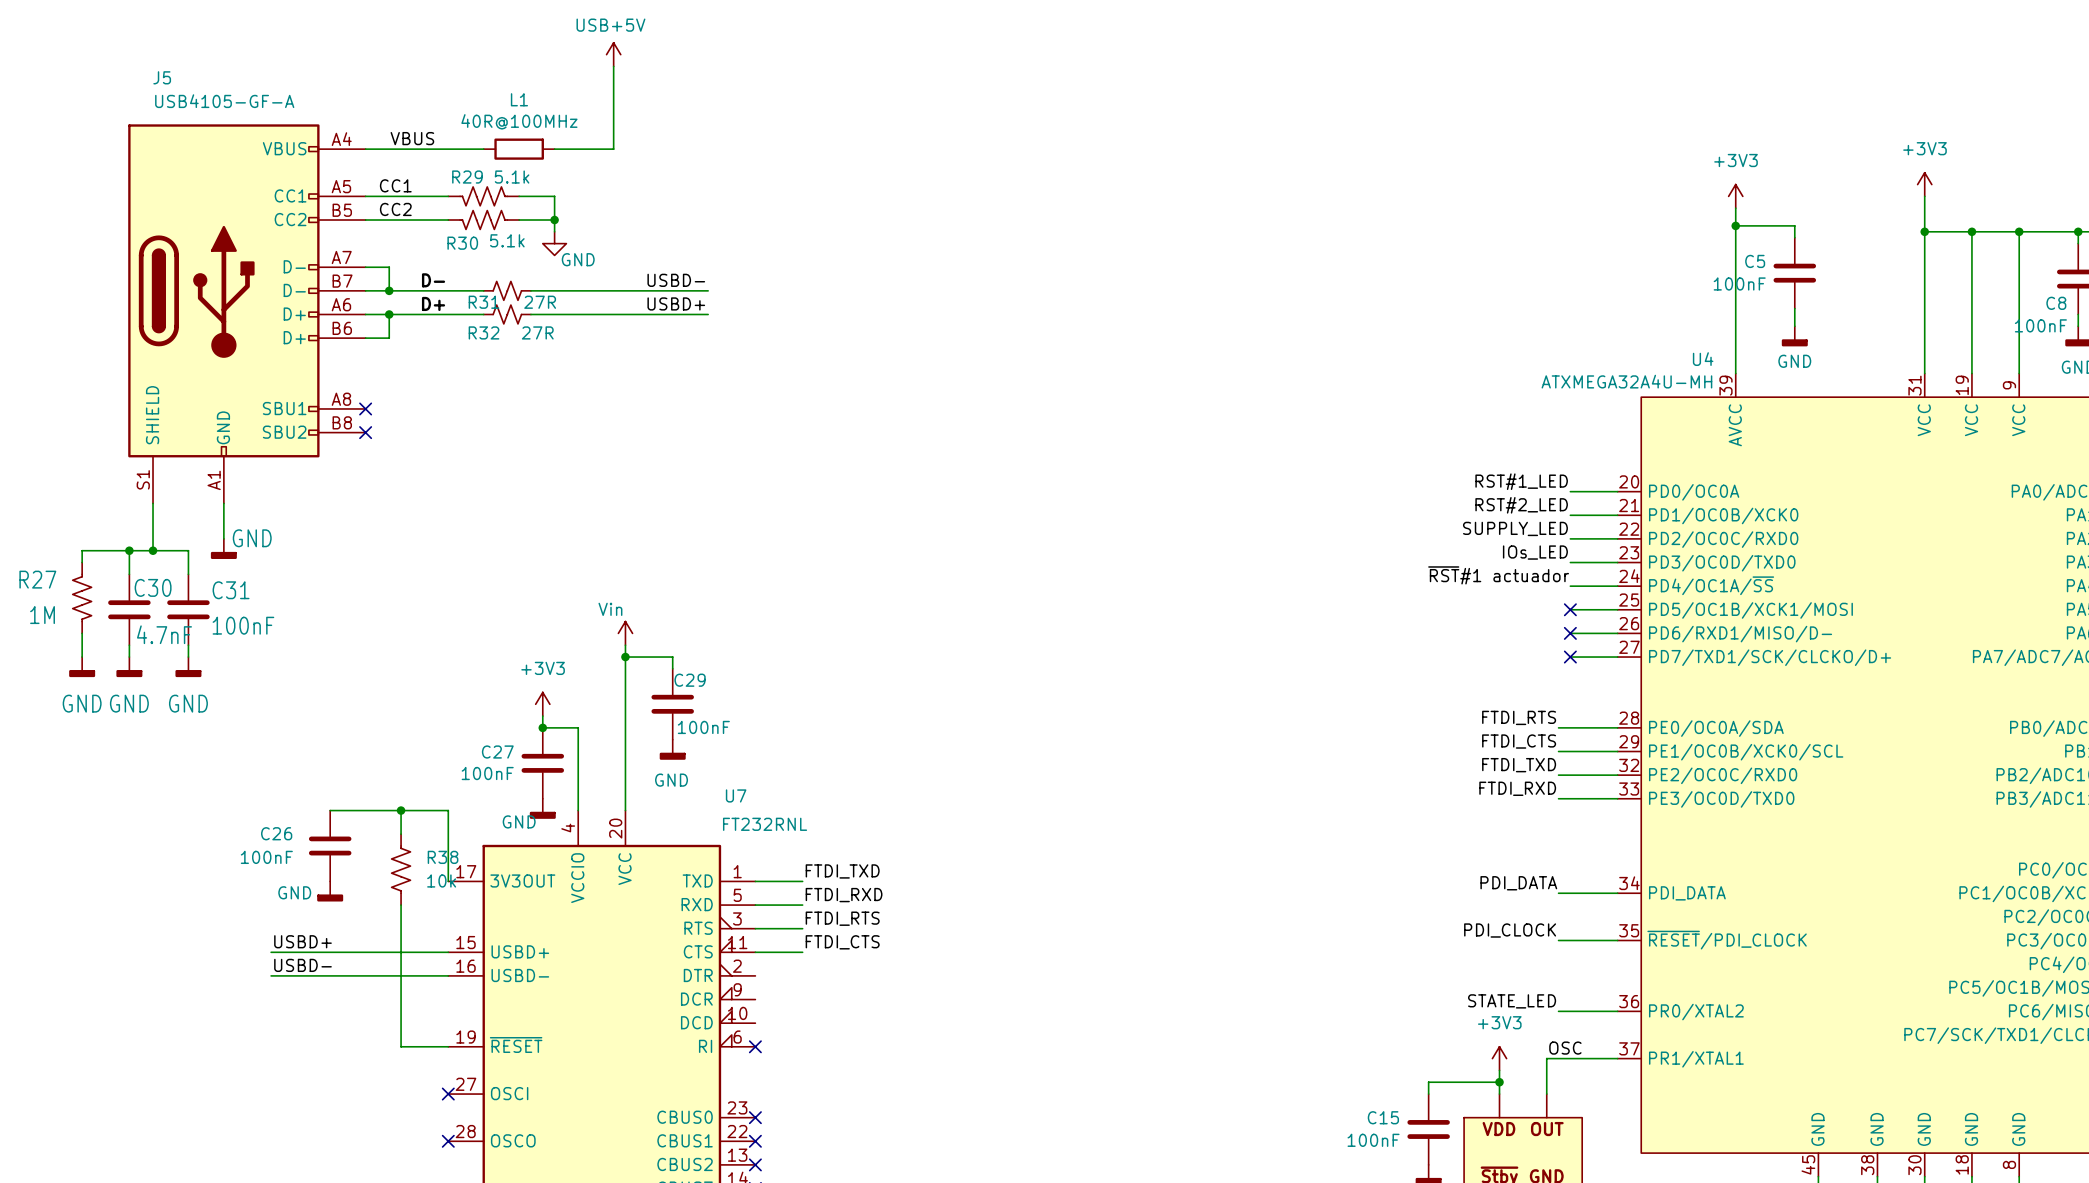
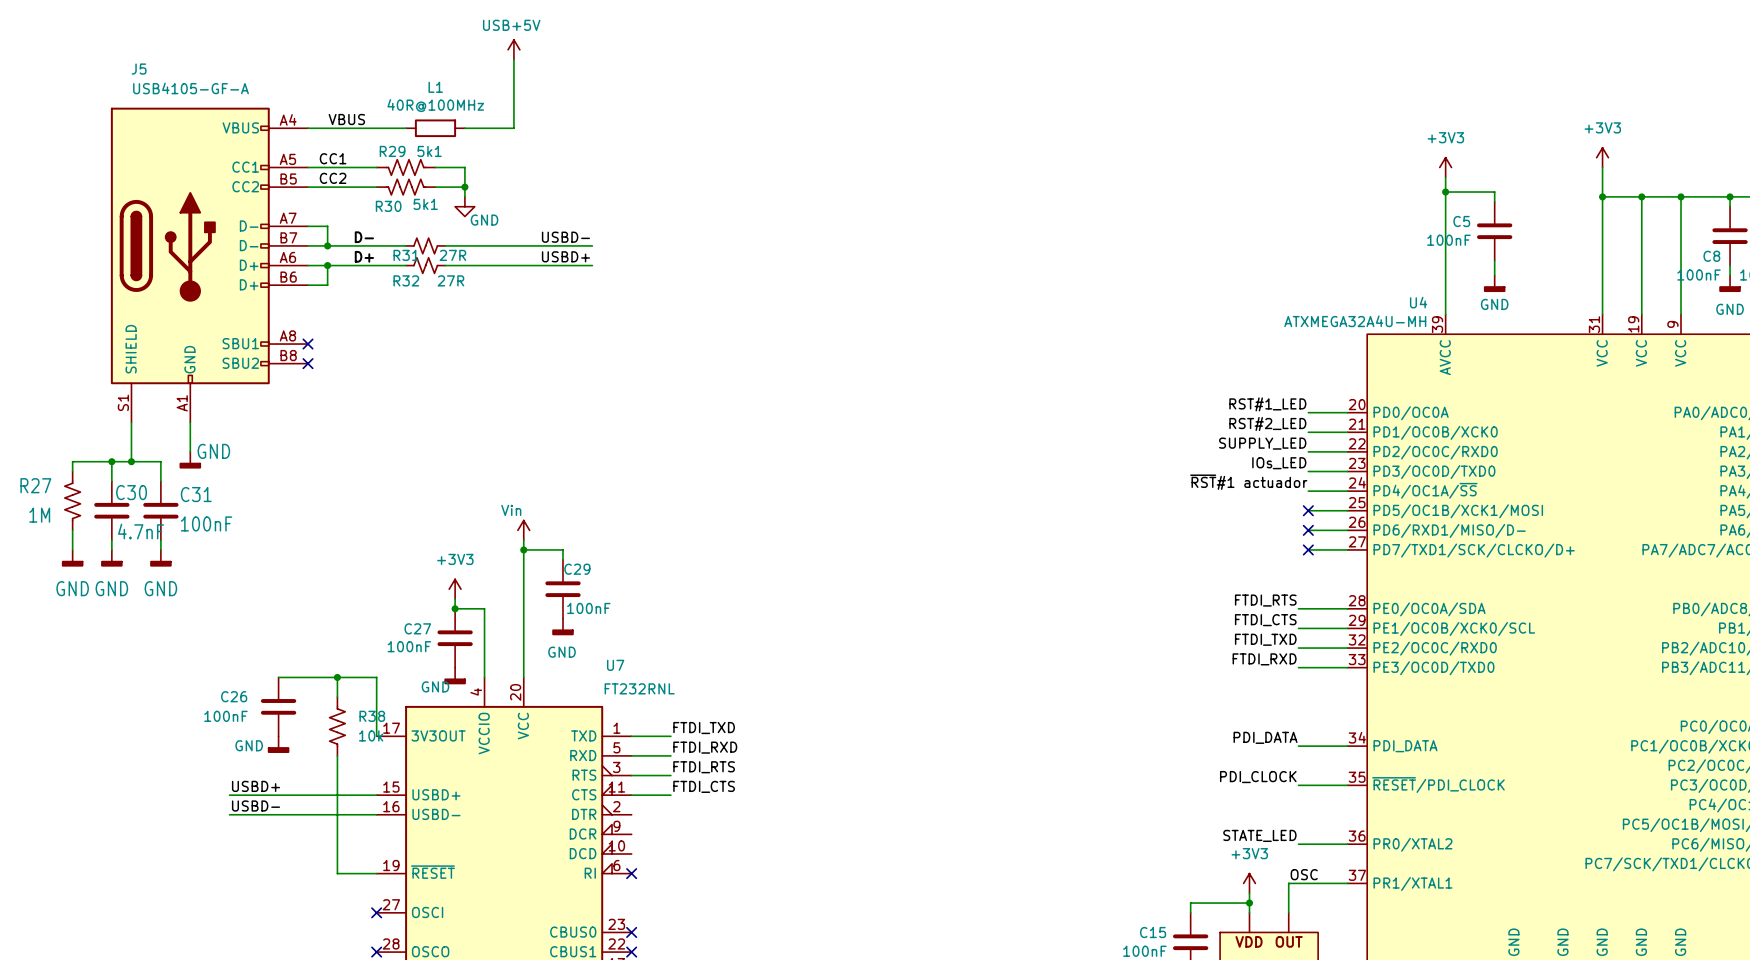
R29 value: 5.1k (512, 177) -> 5k1 (429, 151)
R30 value: 5.1k (507, 240) -> 5k1 (425, 204)

